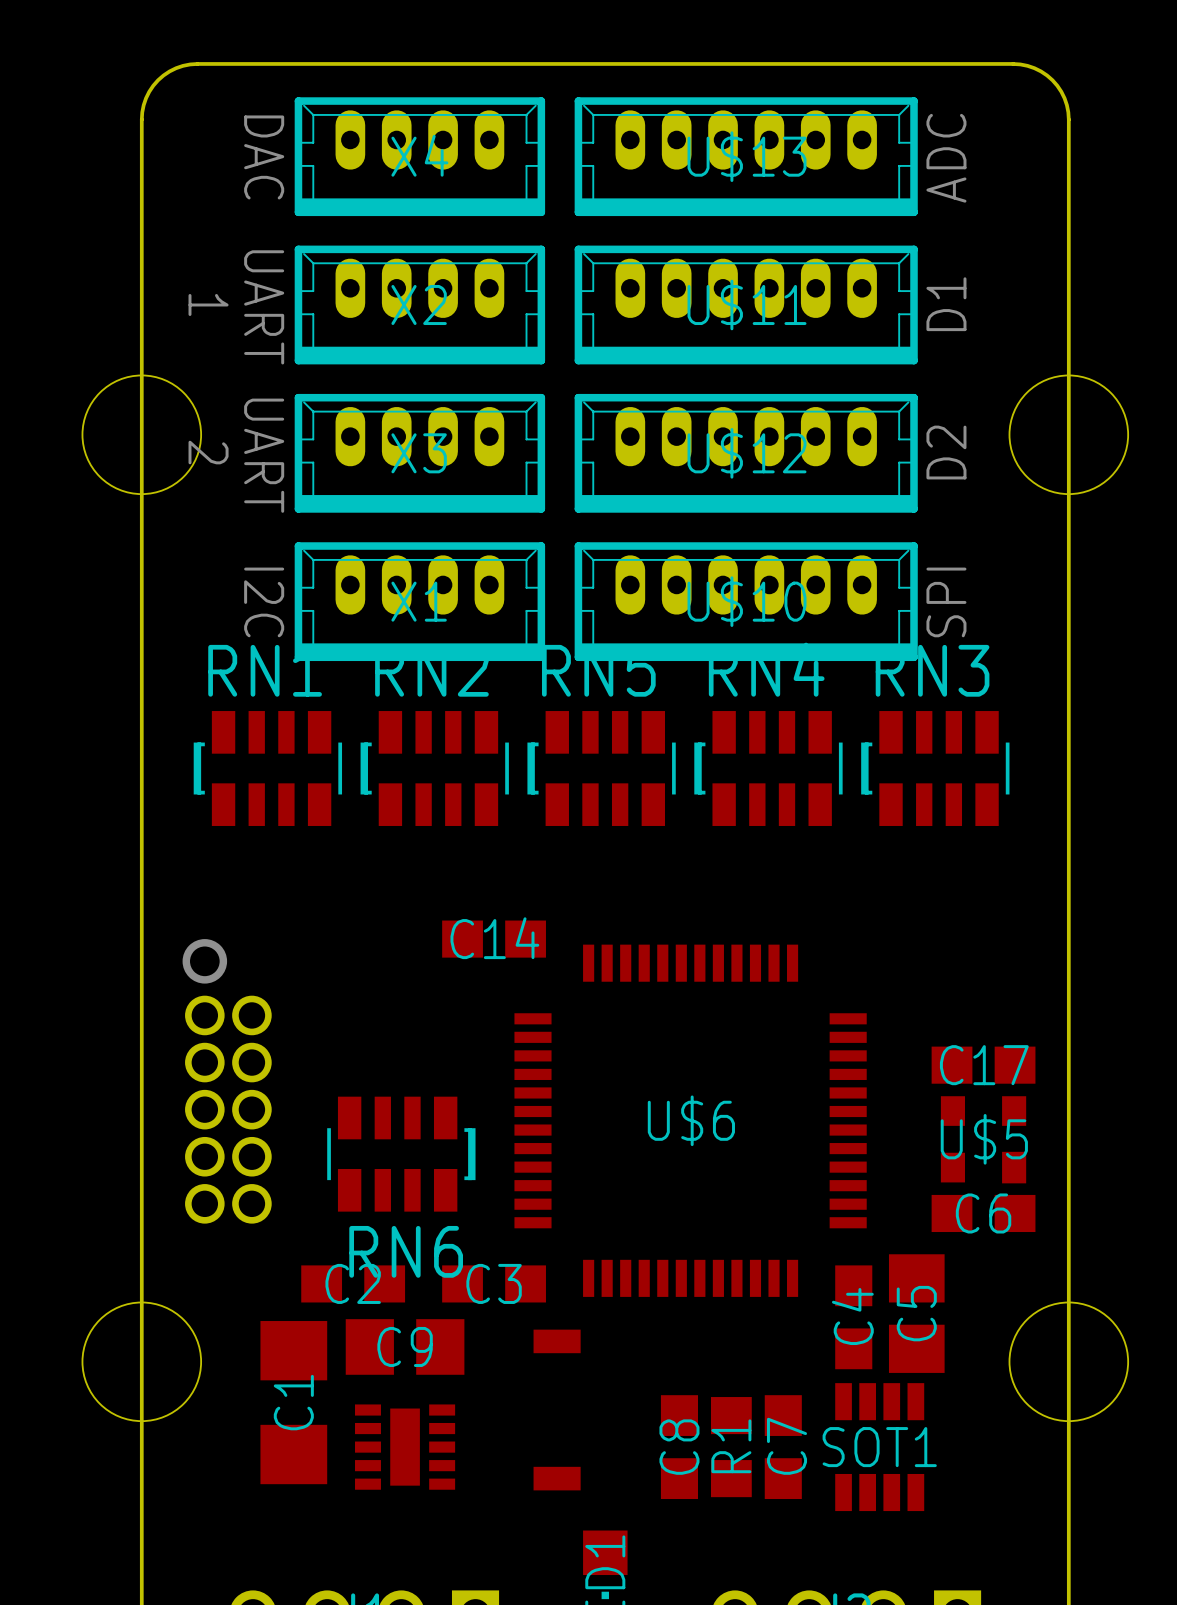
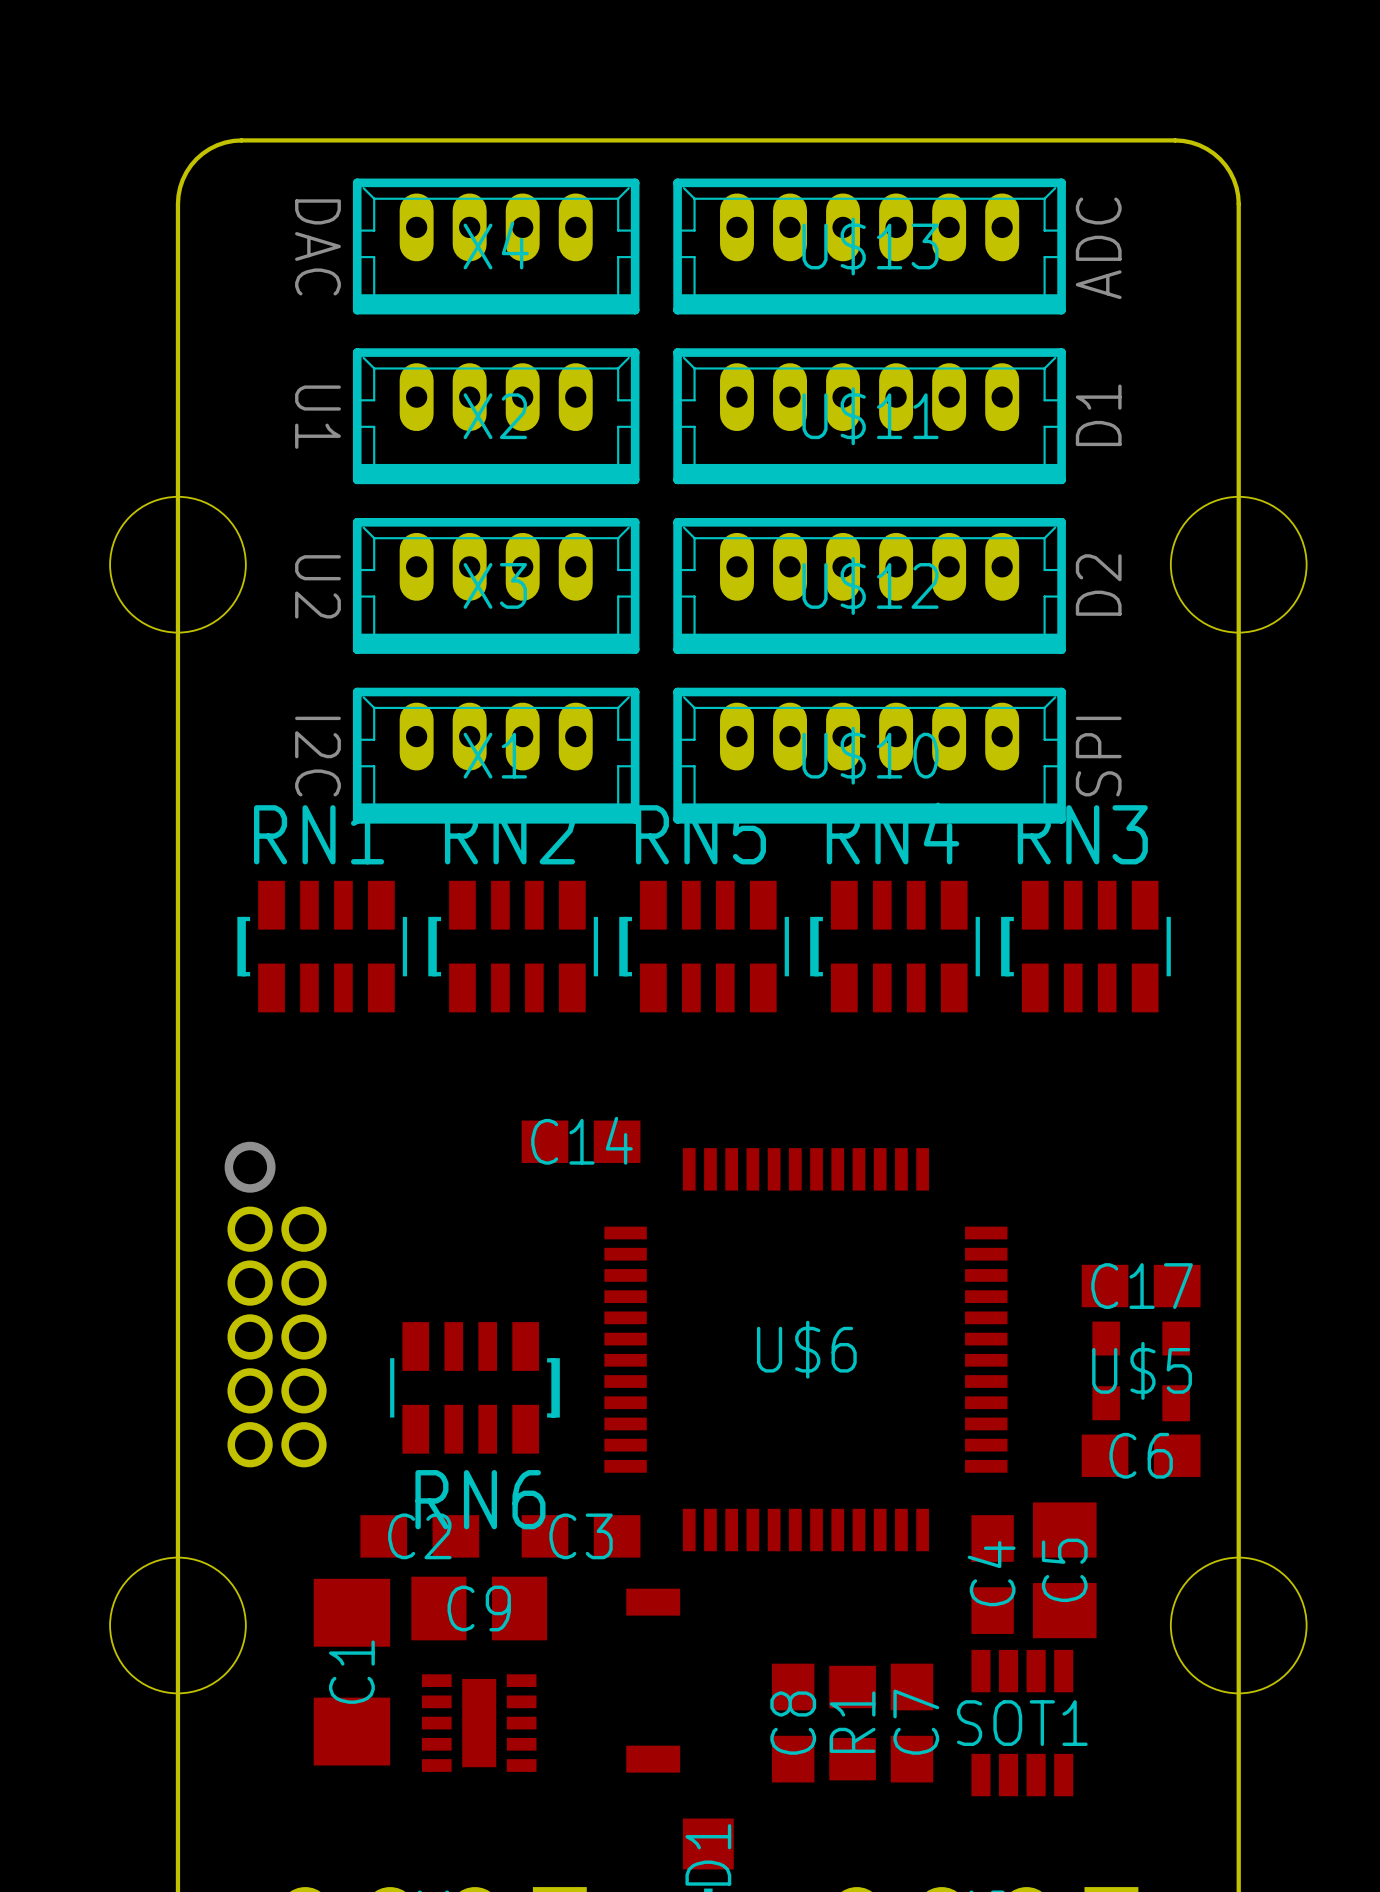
text: 1 (208, 304) -> none
text: UART (264, 307) -> U1 (317, 417)
text: 2 (208, 452) -> none
text: UART (264, 455) -> U2 (317, 586)

